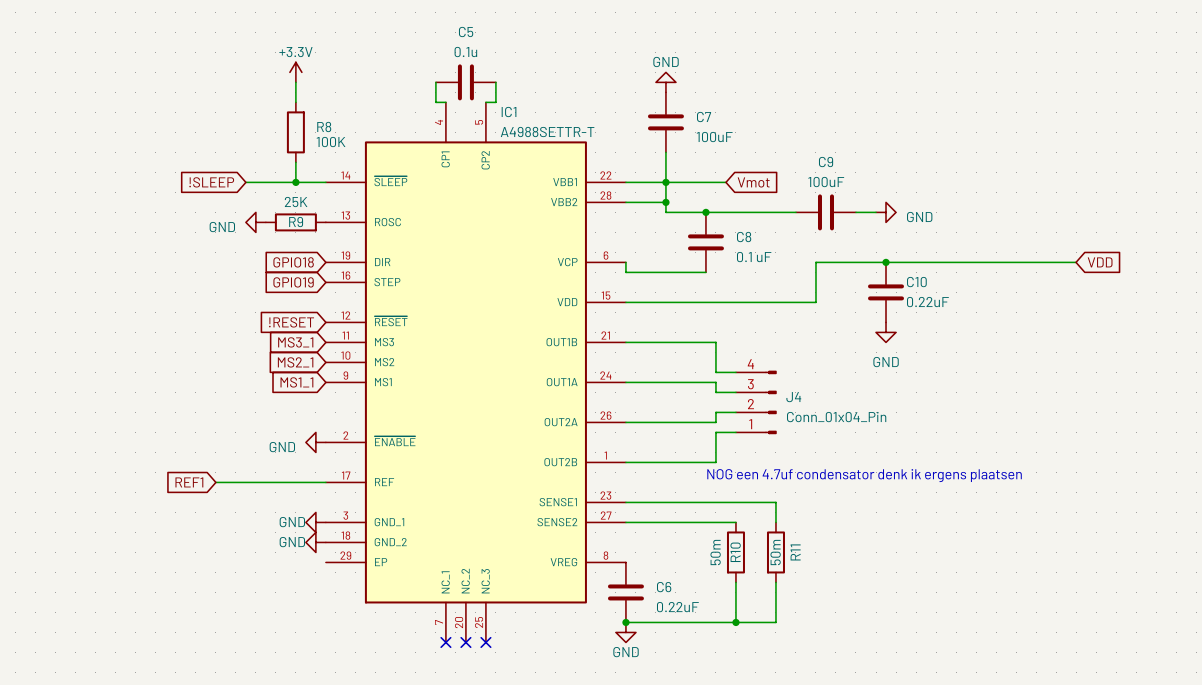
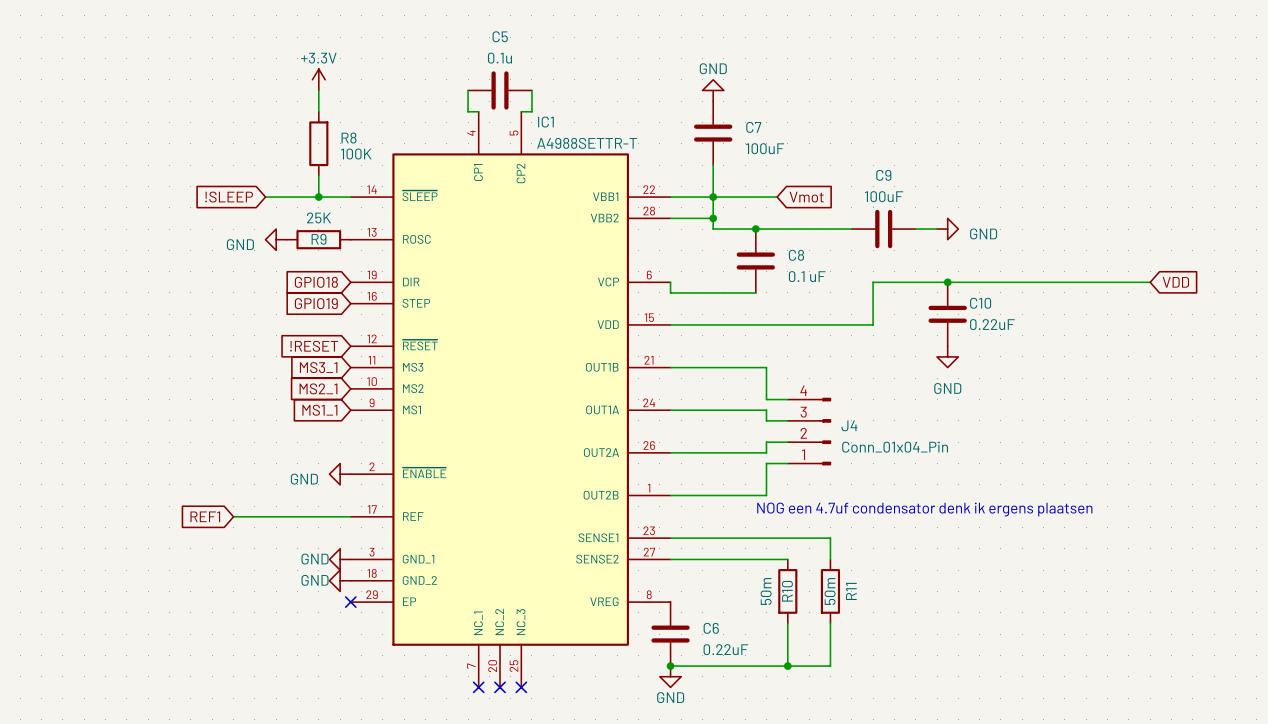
no-connect mark: none -> (350, 602)

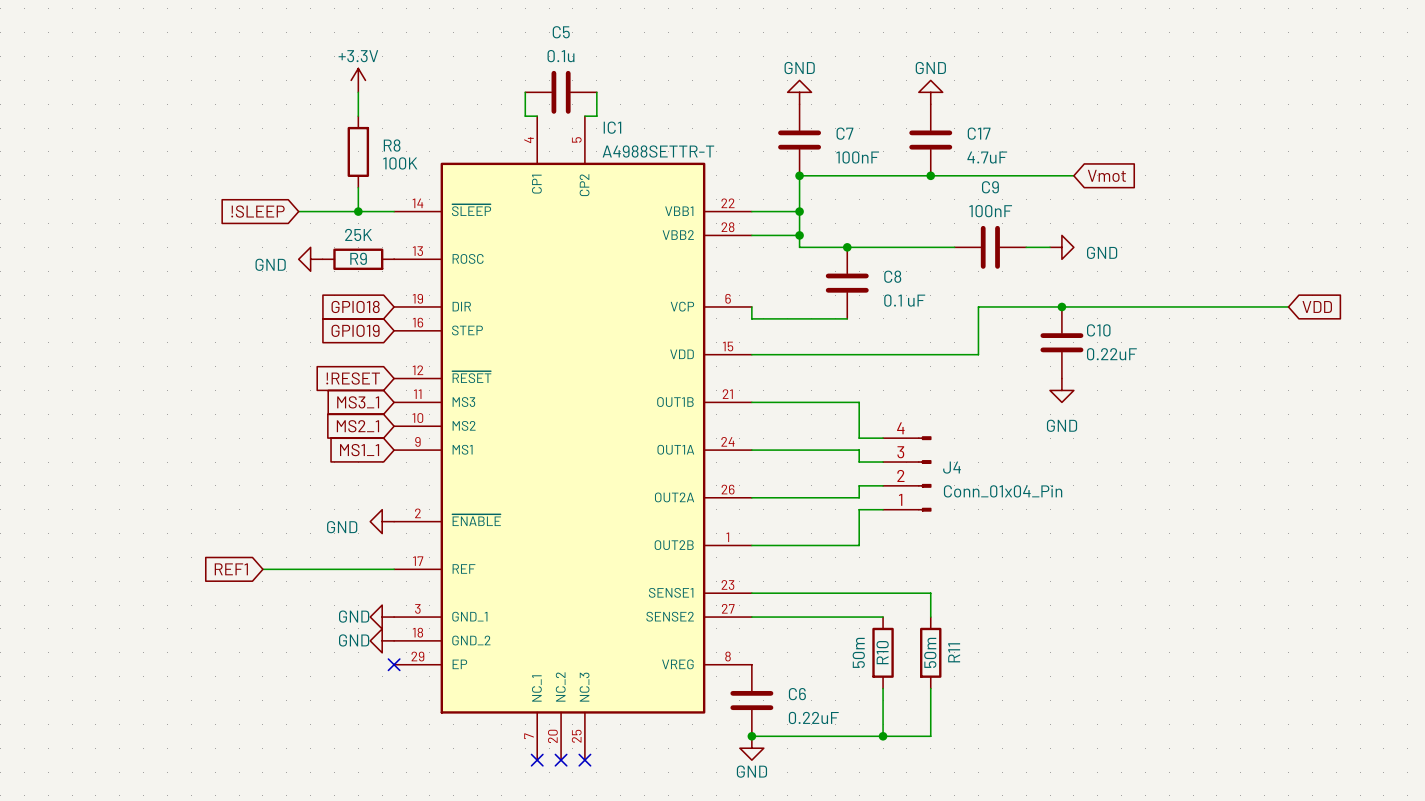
power symbol: none -> GND (930, 92)
C17: none -> 4.7uF (930, 140)
C7 value: 100uF (765, 148) -> 100nF (857, 157)
wire: none -> (799, 175) (1073, 175)
junction: none -> (799, 175)
junction: none -> (930, 175)
C9 value: 100uF (884, 196) -> 100nF (990, 211)
wire: (713, 197) (777, 197) -> none
global label position: Vmot (806, 197) -> Vmot (1106, 175)
text: NOG een 4.7uf condensator denk ik ergens plaatsen (924, 509) -> none

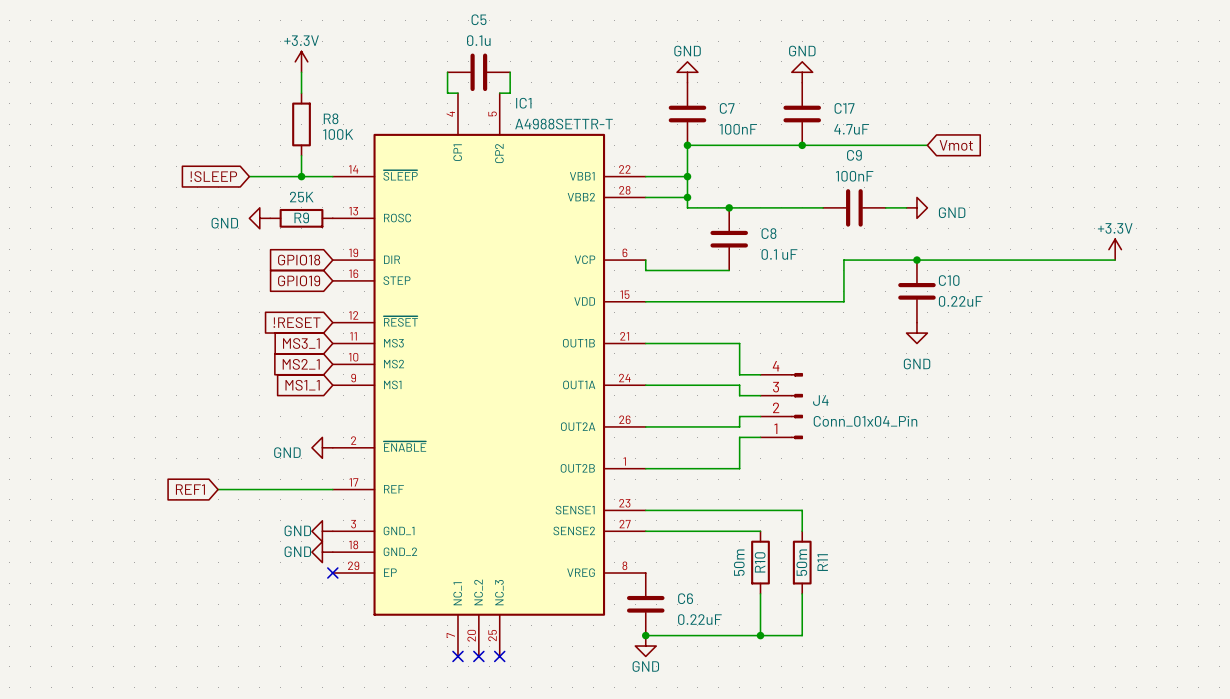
power symbol: none -> +3.3V (1115, 249)
global label: VDD (1317, 306) -> none

